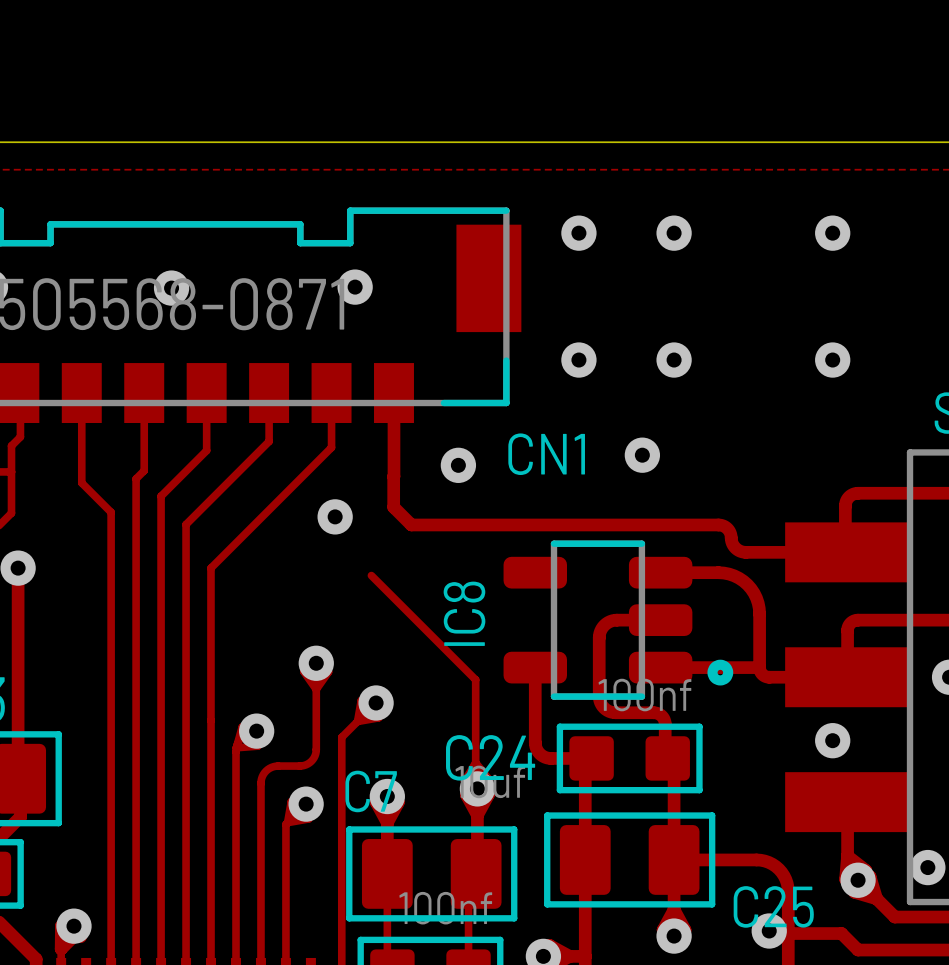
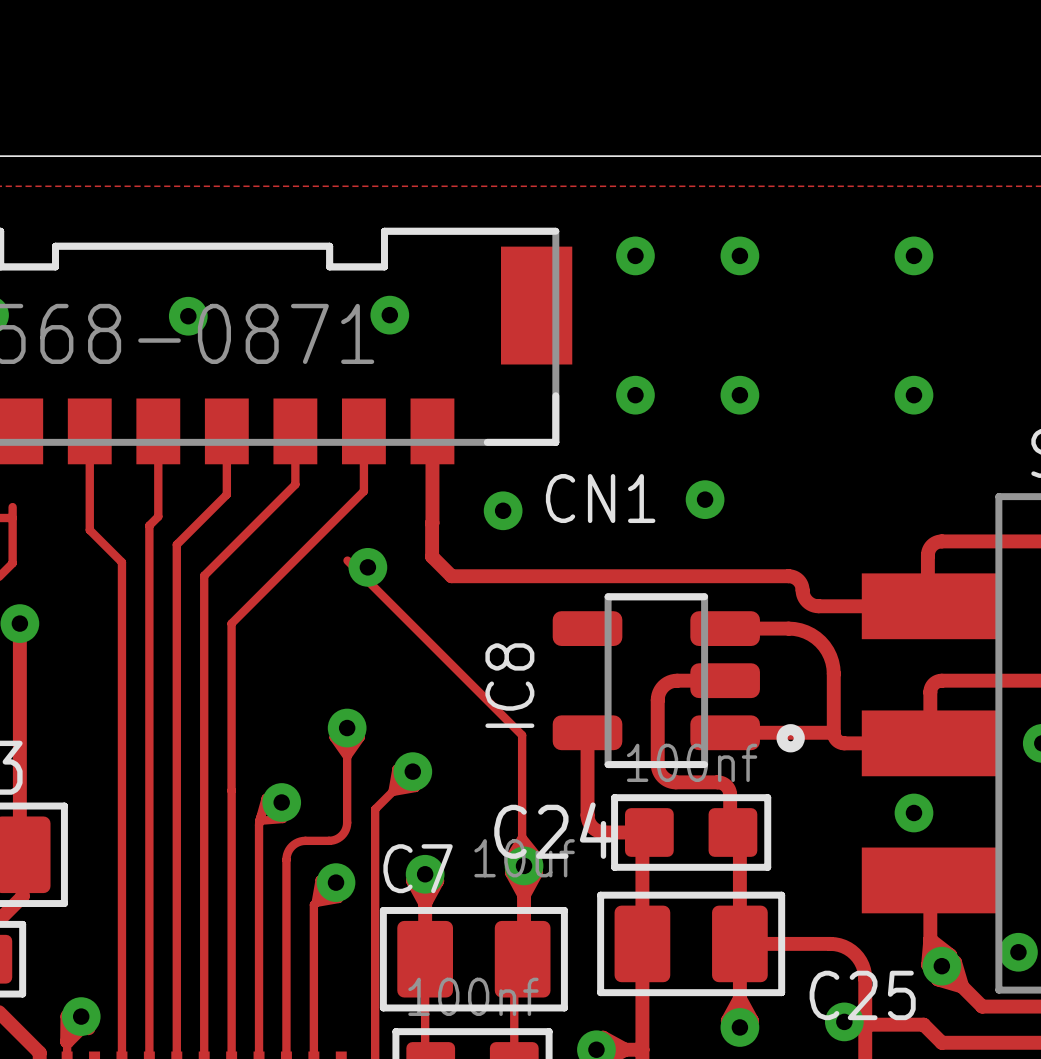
track: (19, 393) (20, 436) (11, 445) (11, 461) -> none
track: (371, 575) (475, 679) -> (347, 560) (522, 735) (522, 746)

